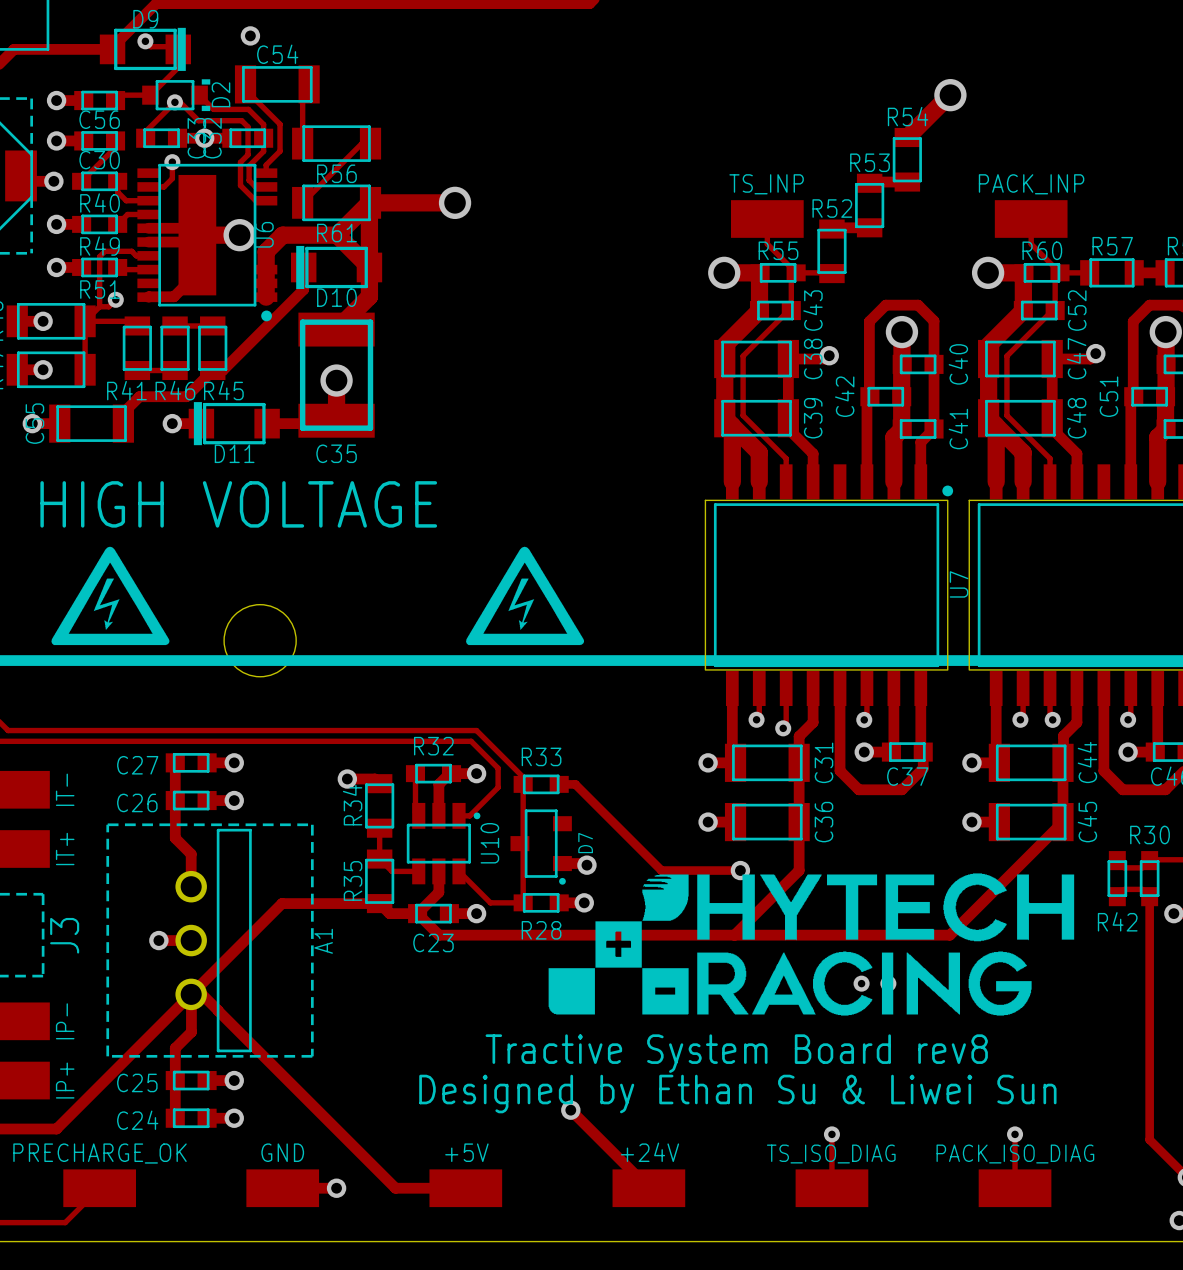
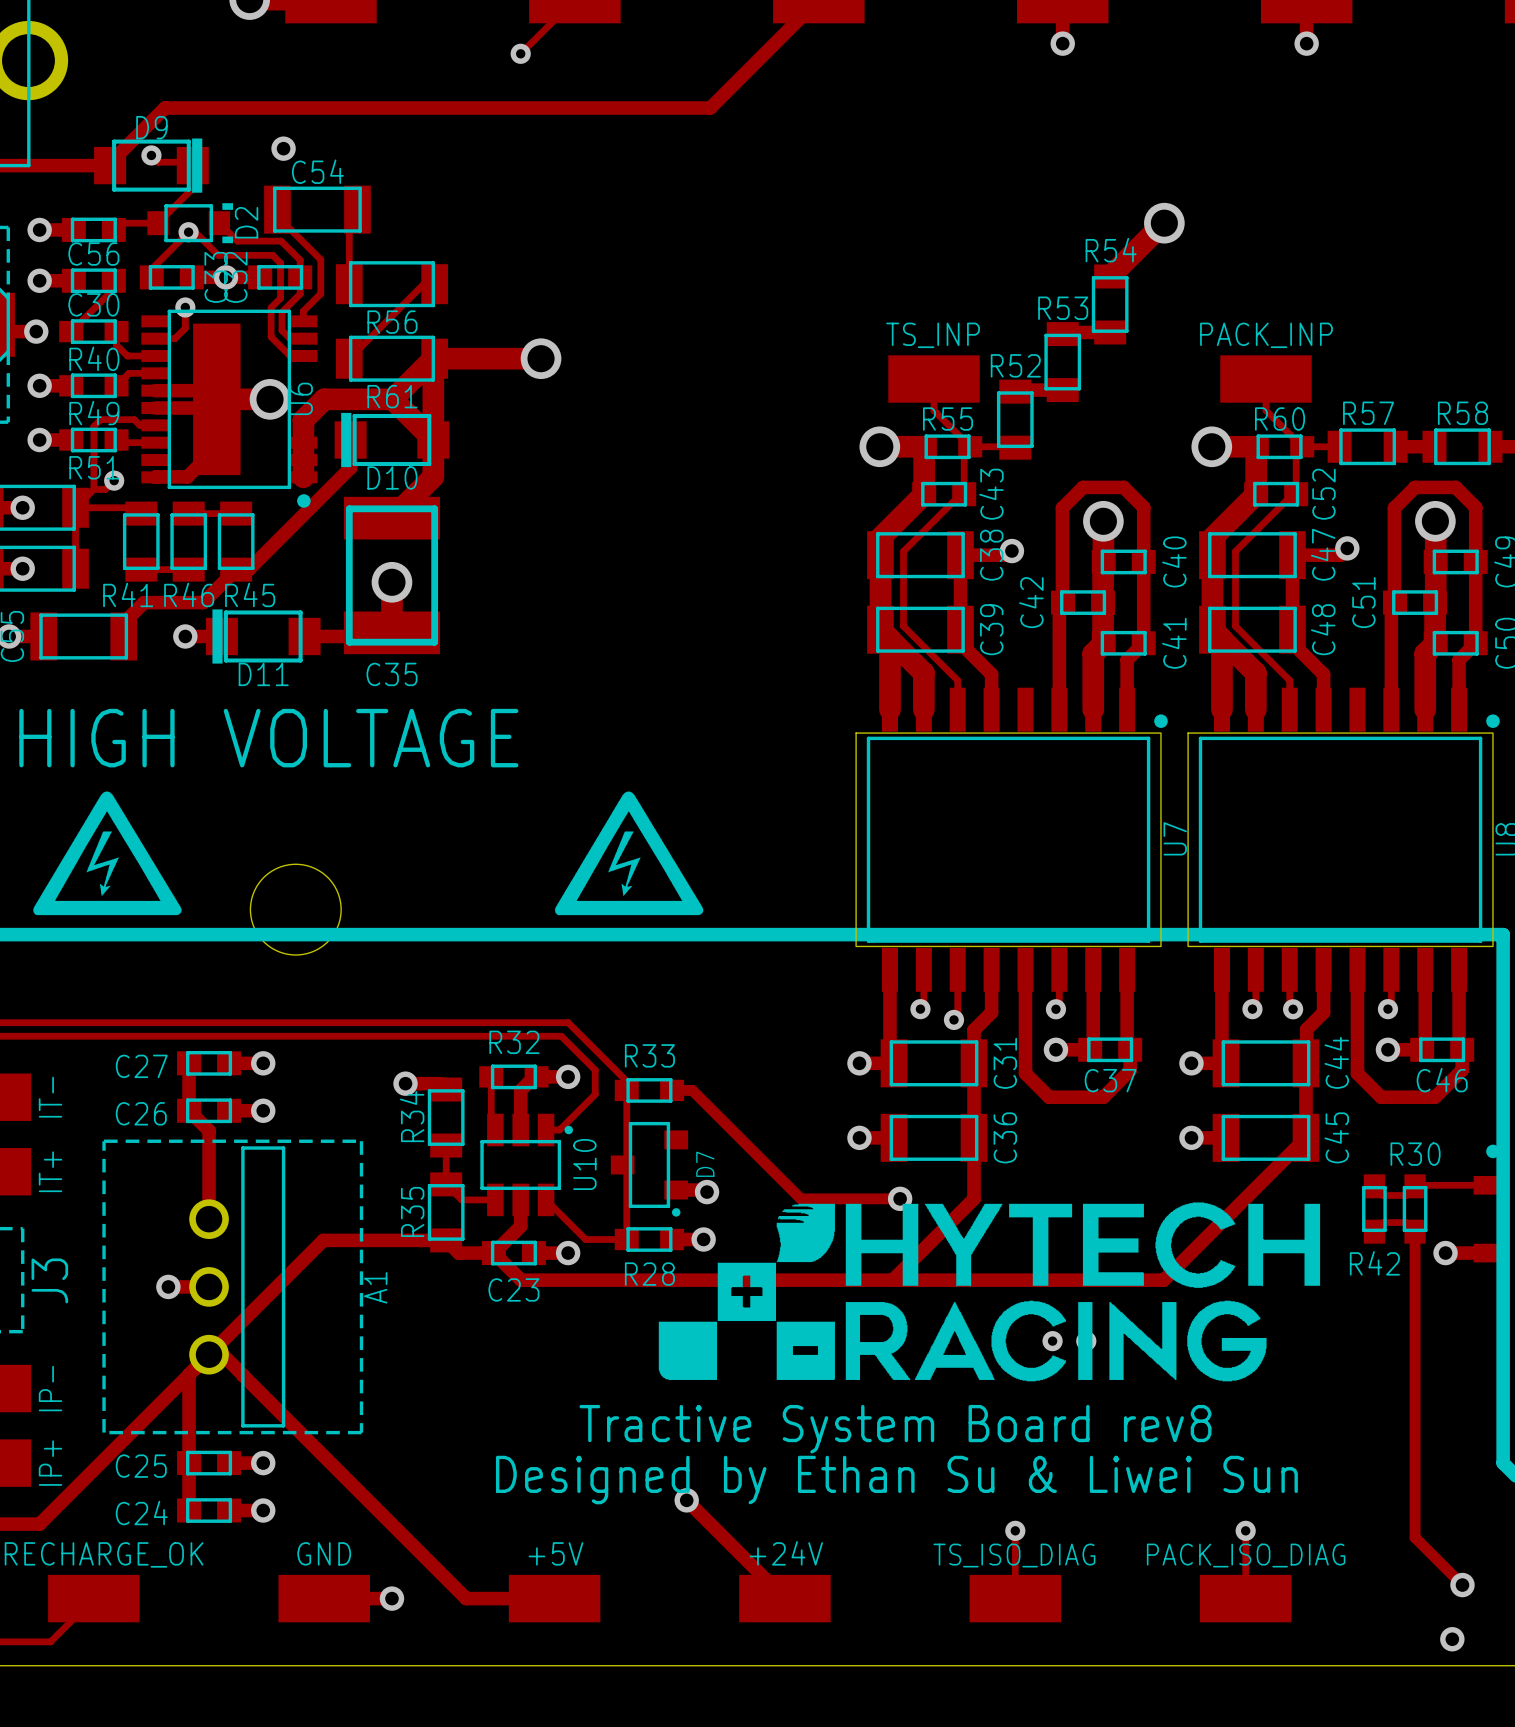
track: (175, 800) (175, 838) (191, 854) -> (189, 1110) (209, 1130) (209, 1178)
track: (191, 994) (191, 1032) (175, 1048) -> (189, 1374) (189, 1422)

